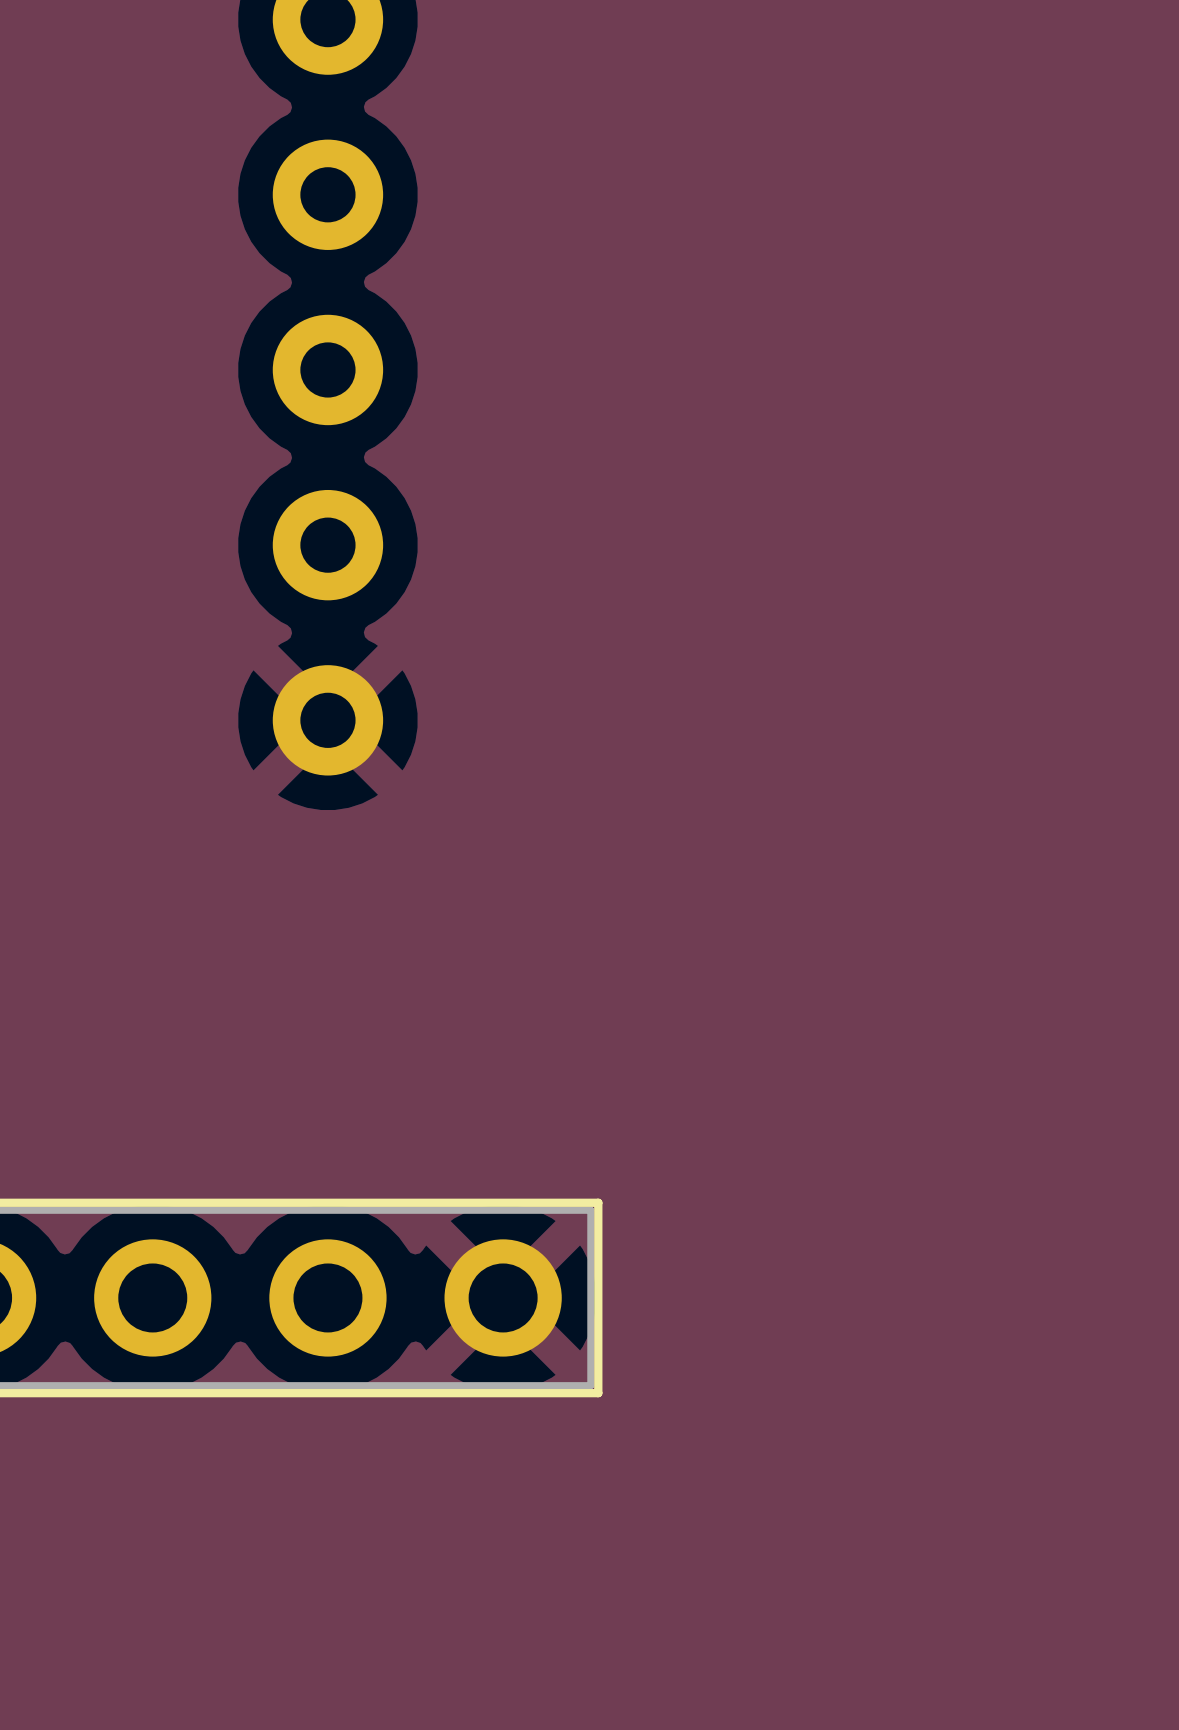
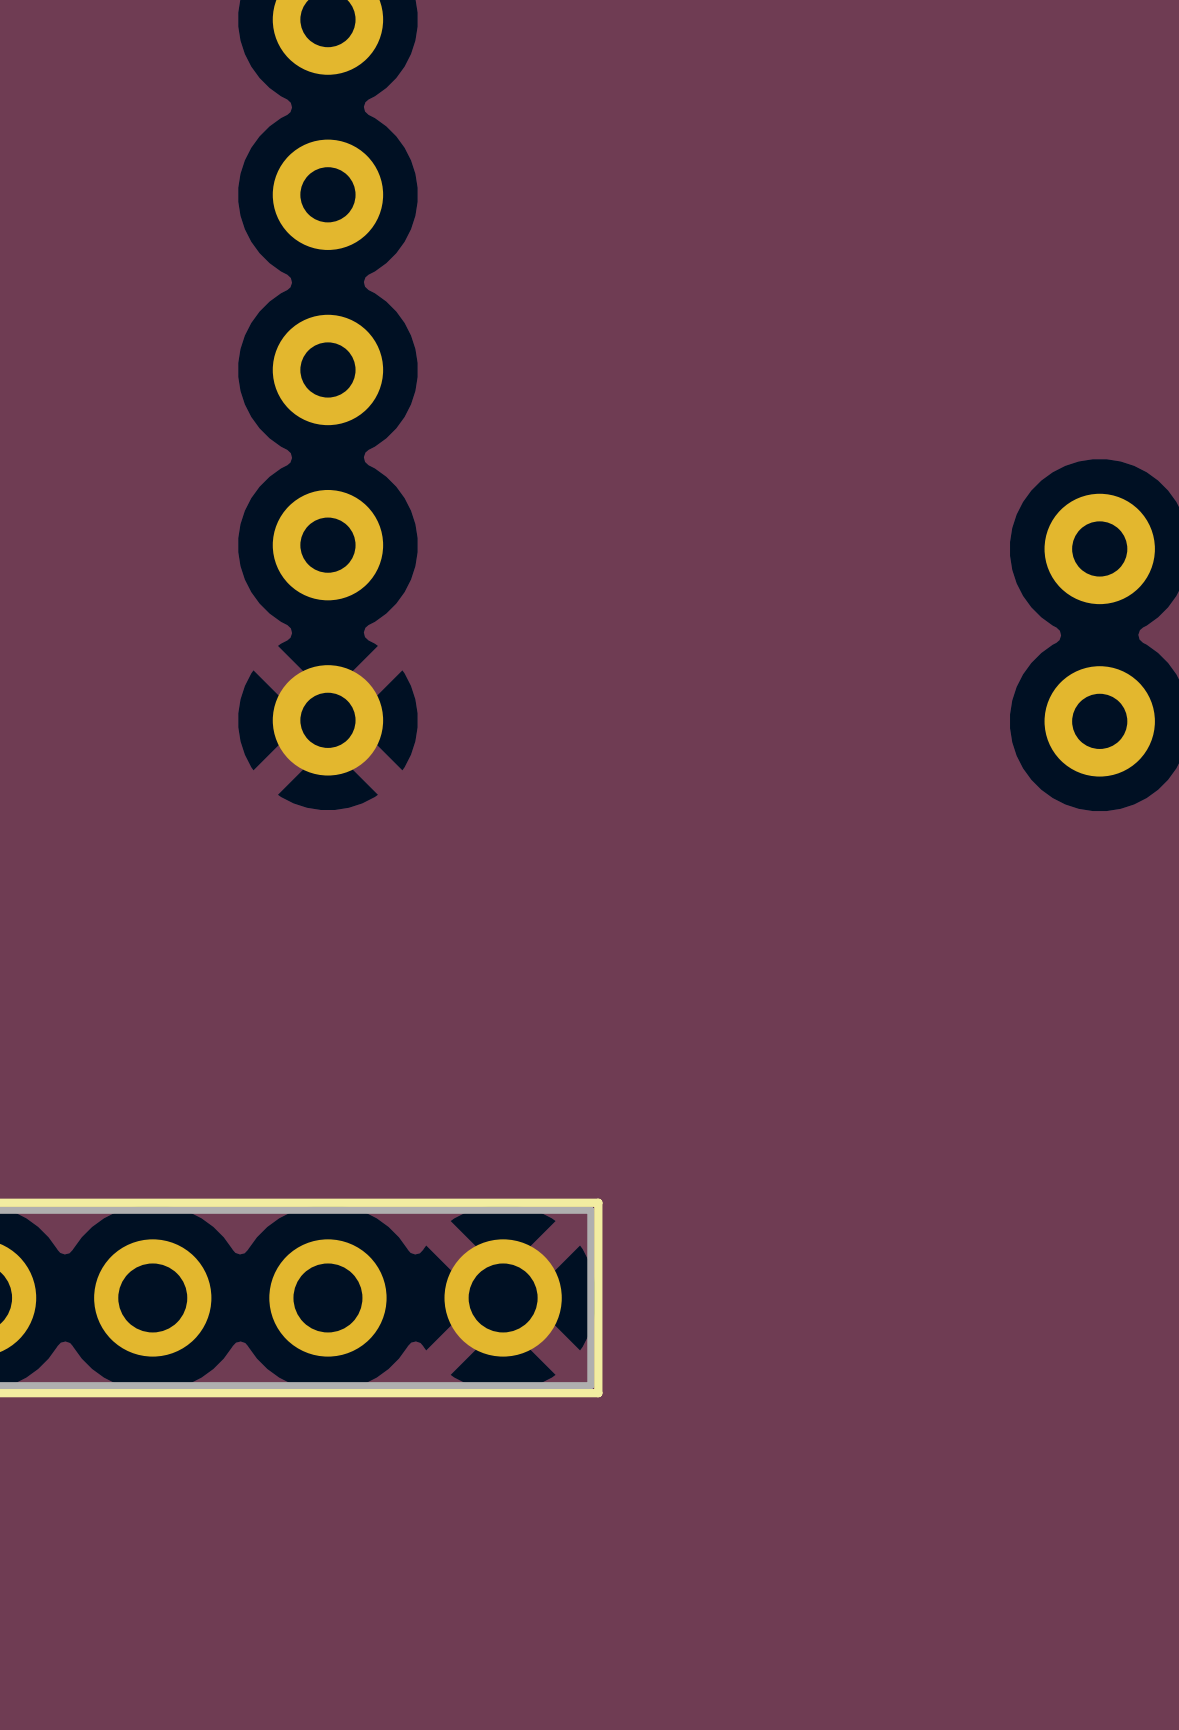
part: none -> (1099, 635)

